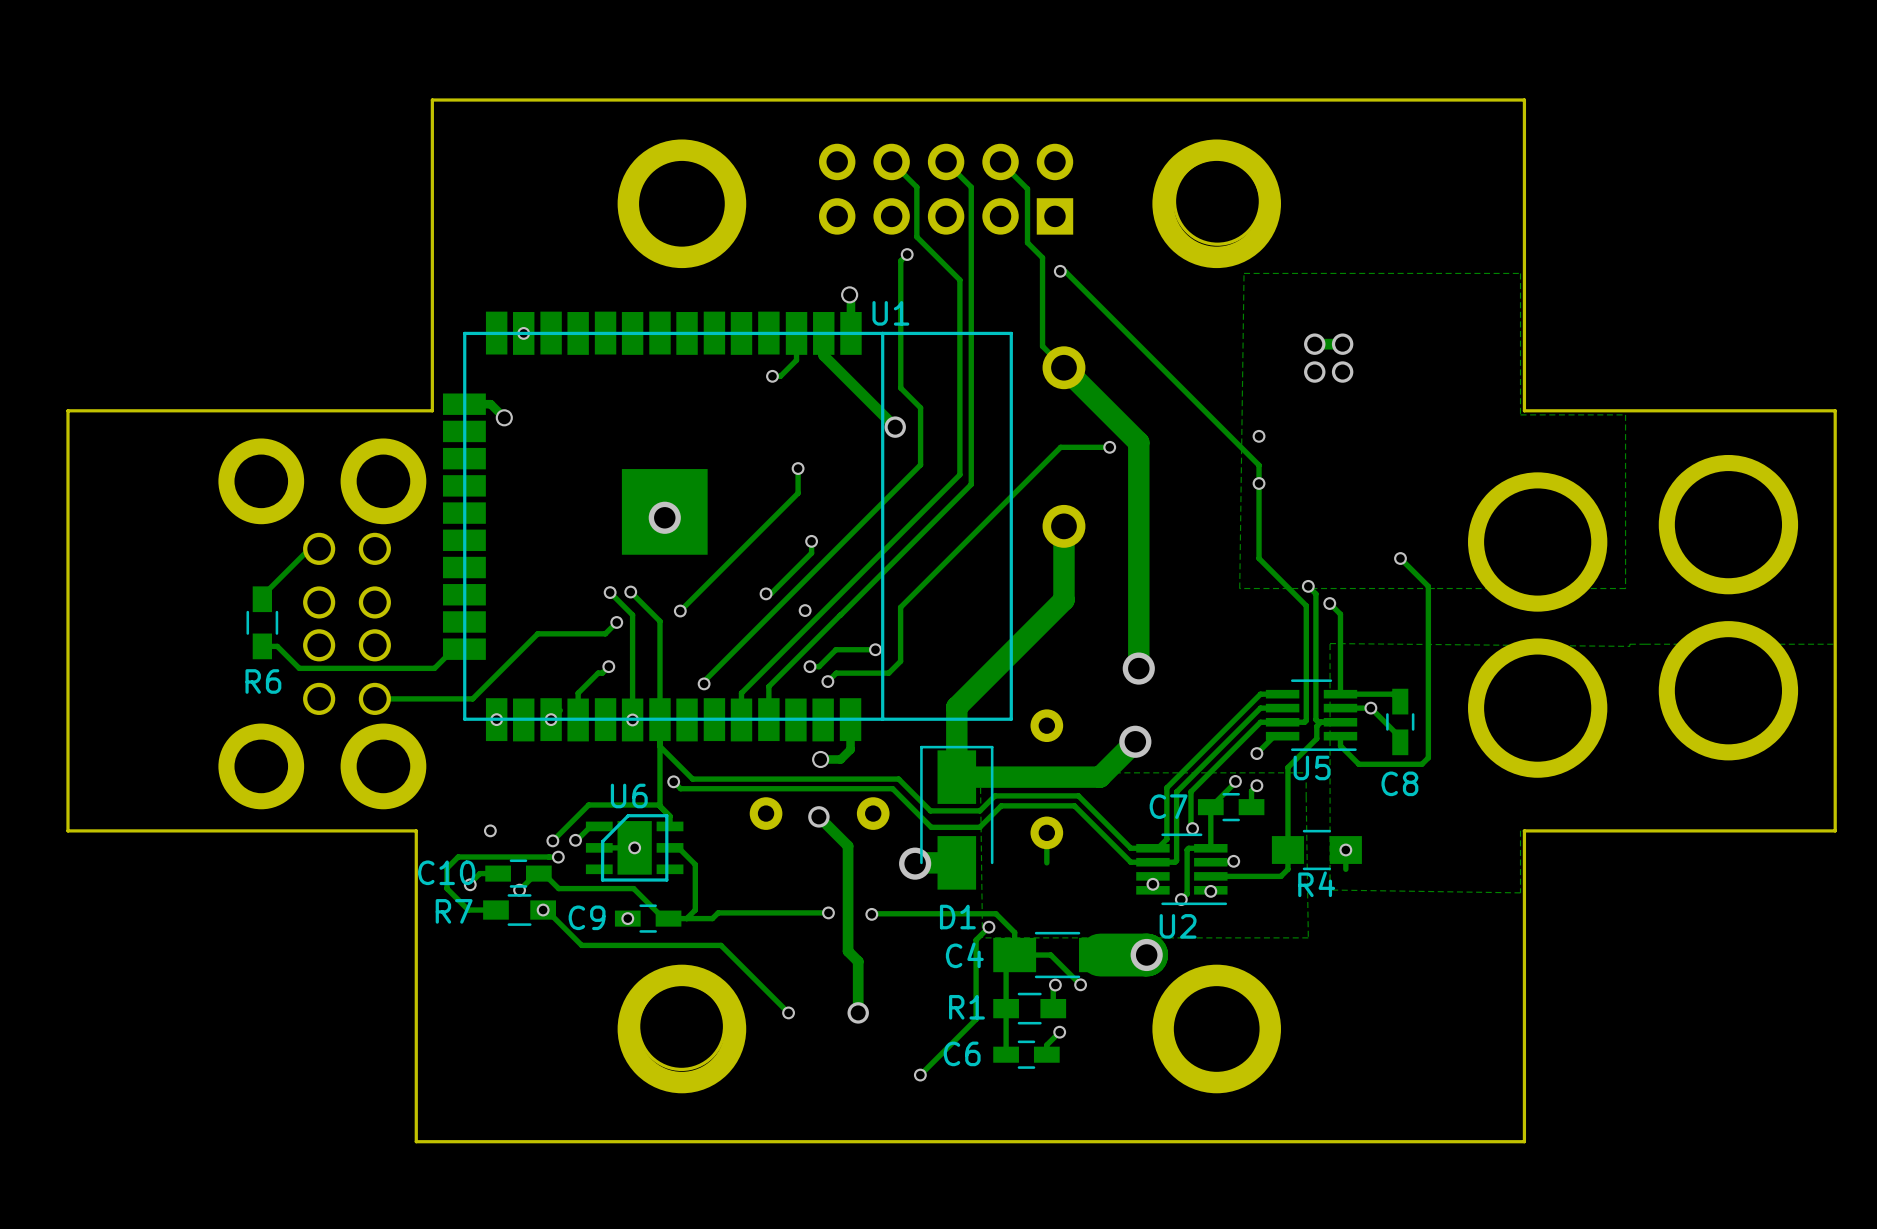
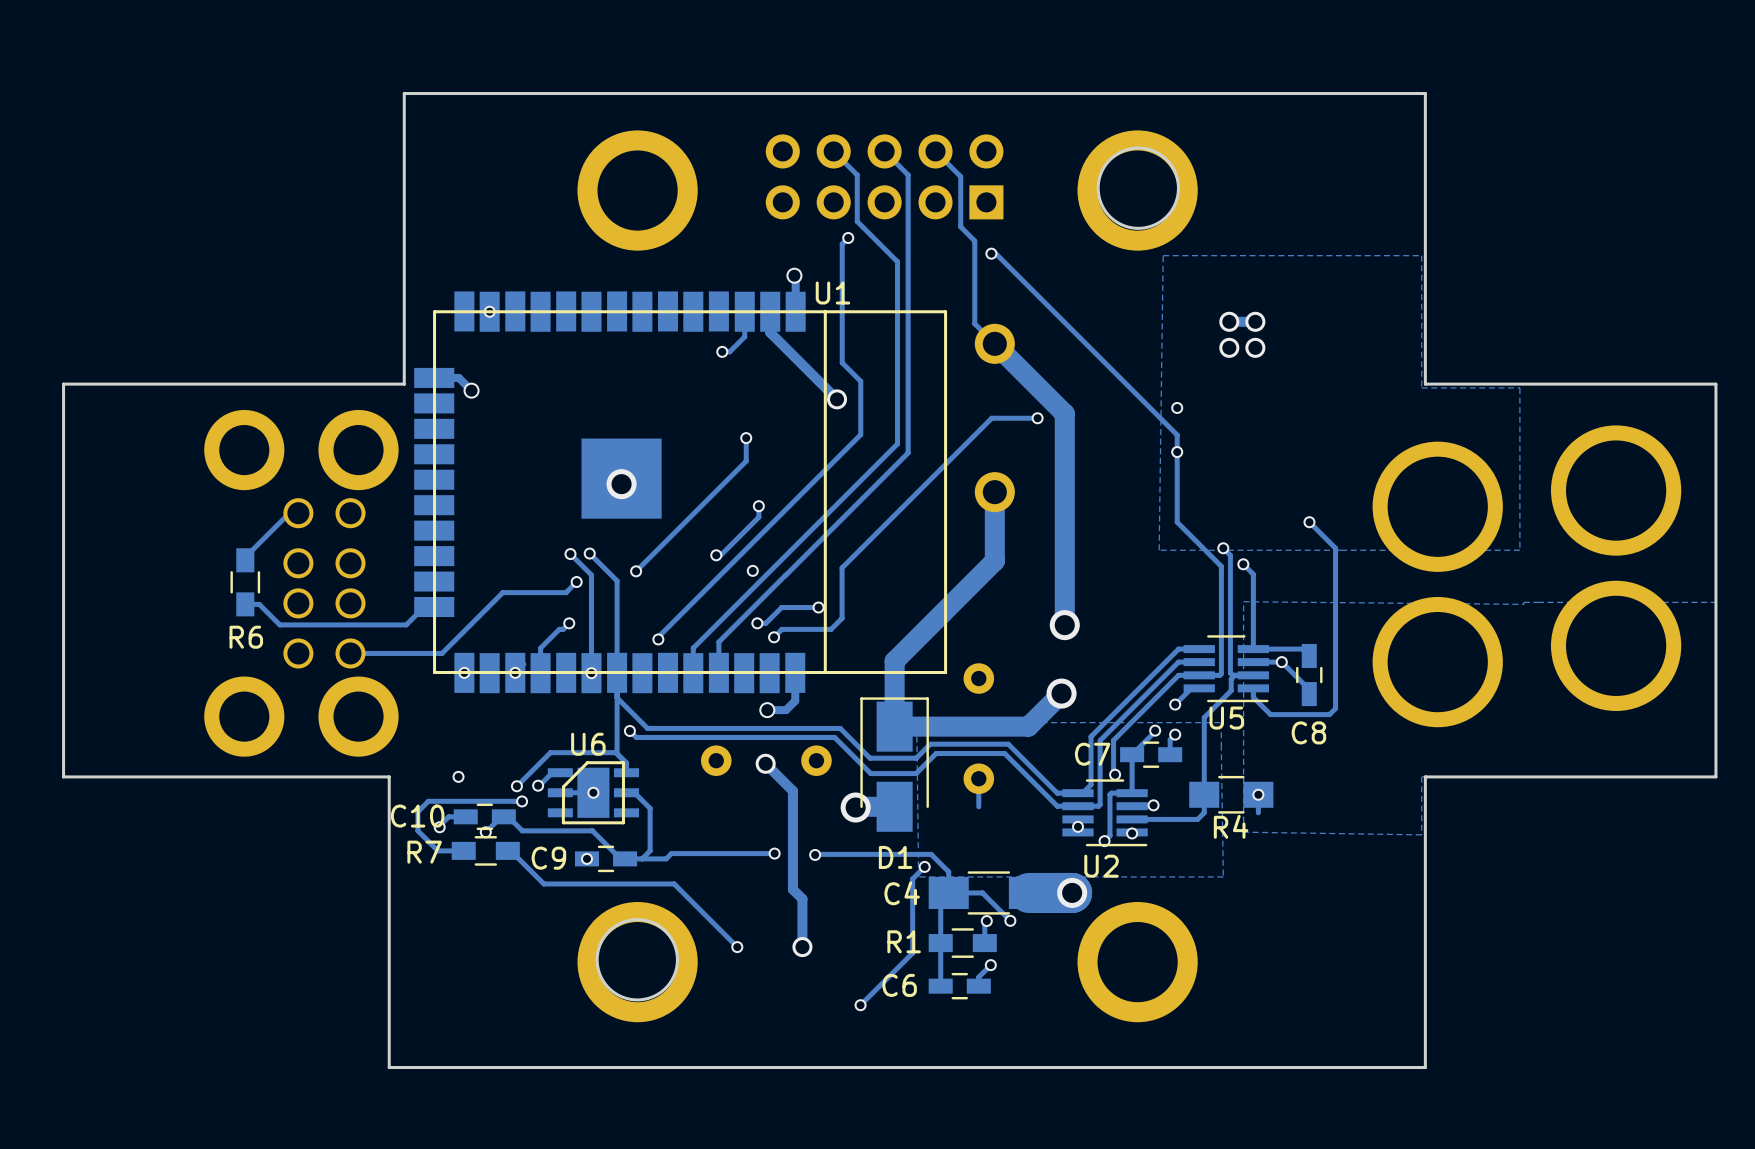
via: (543, 910) -> none

